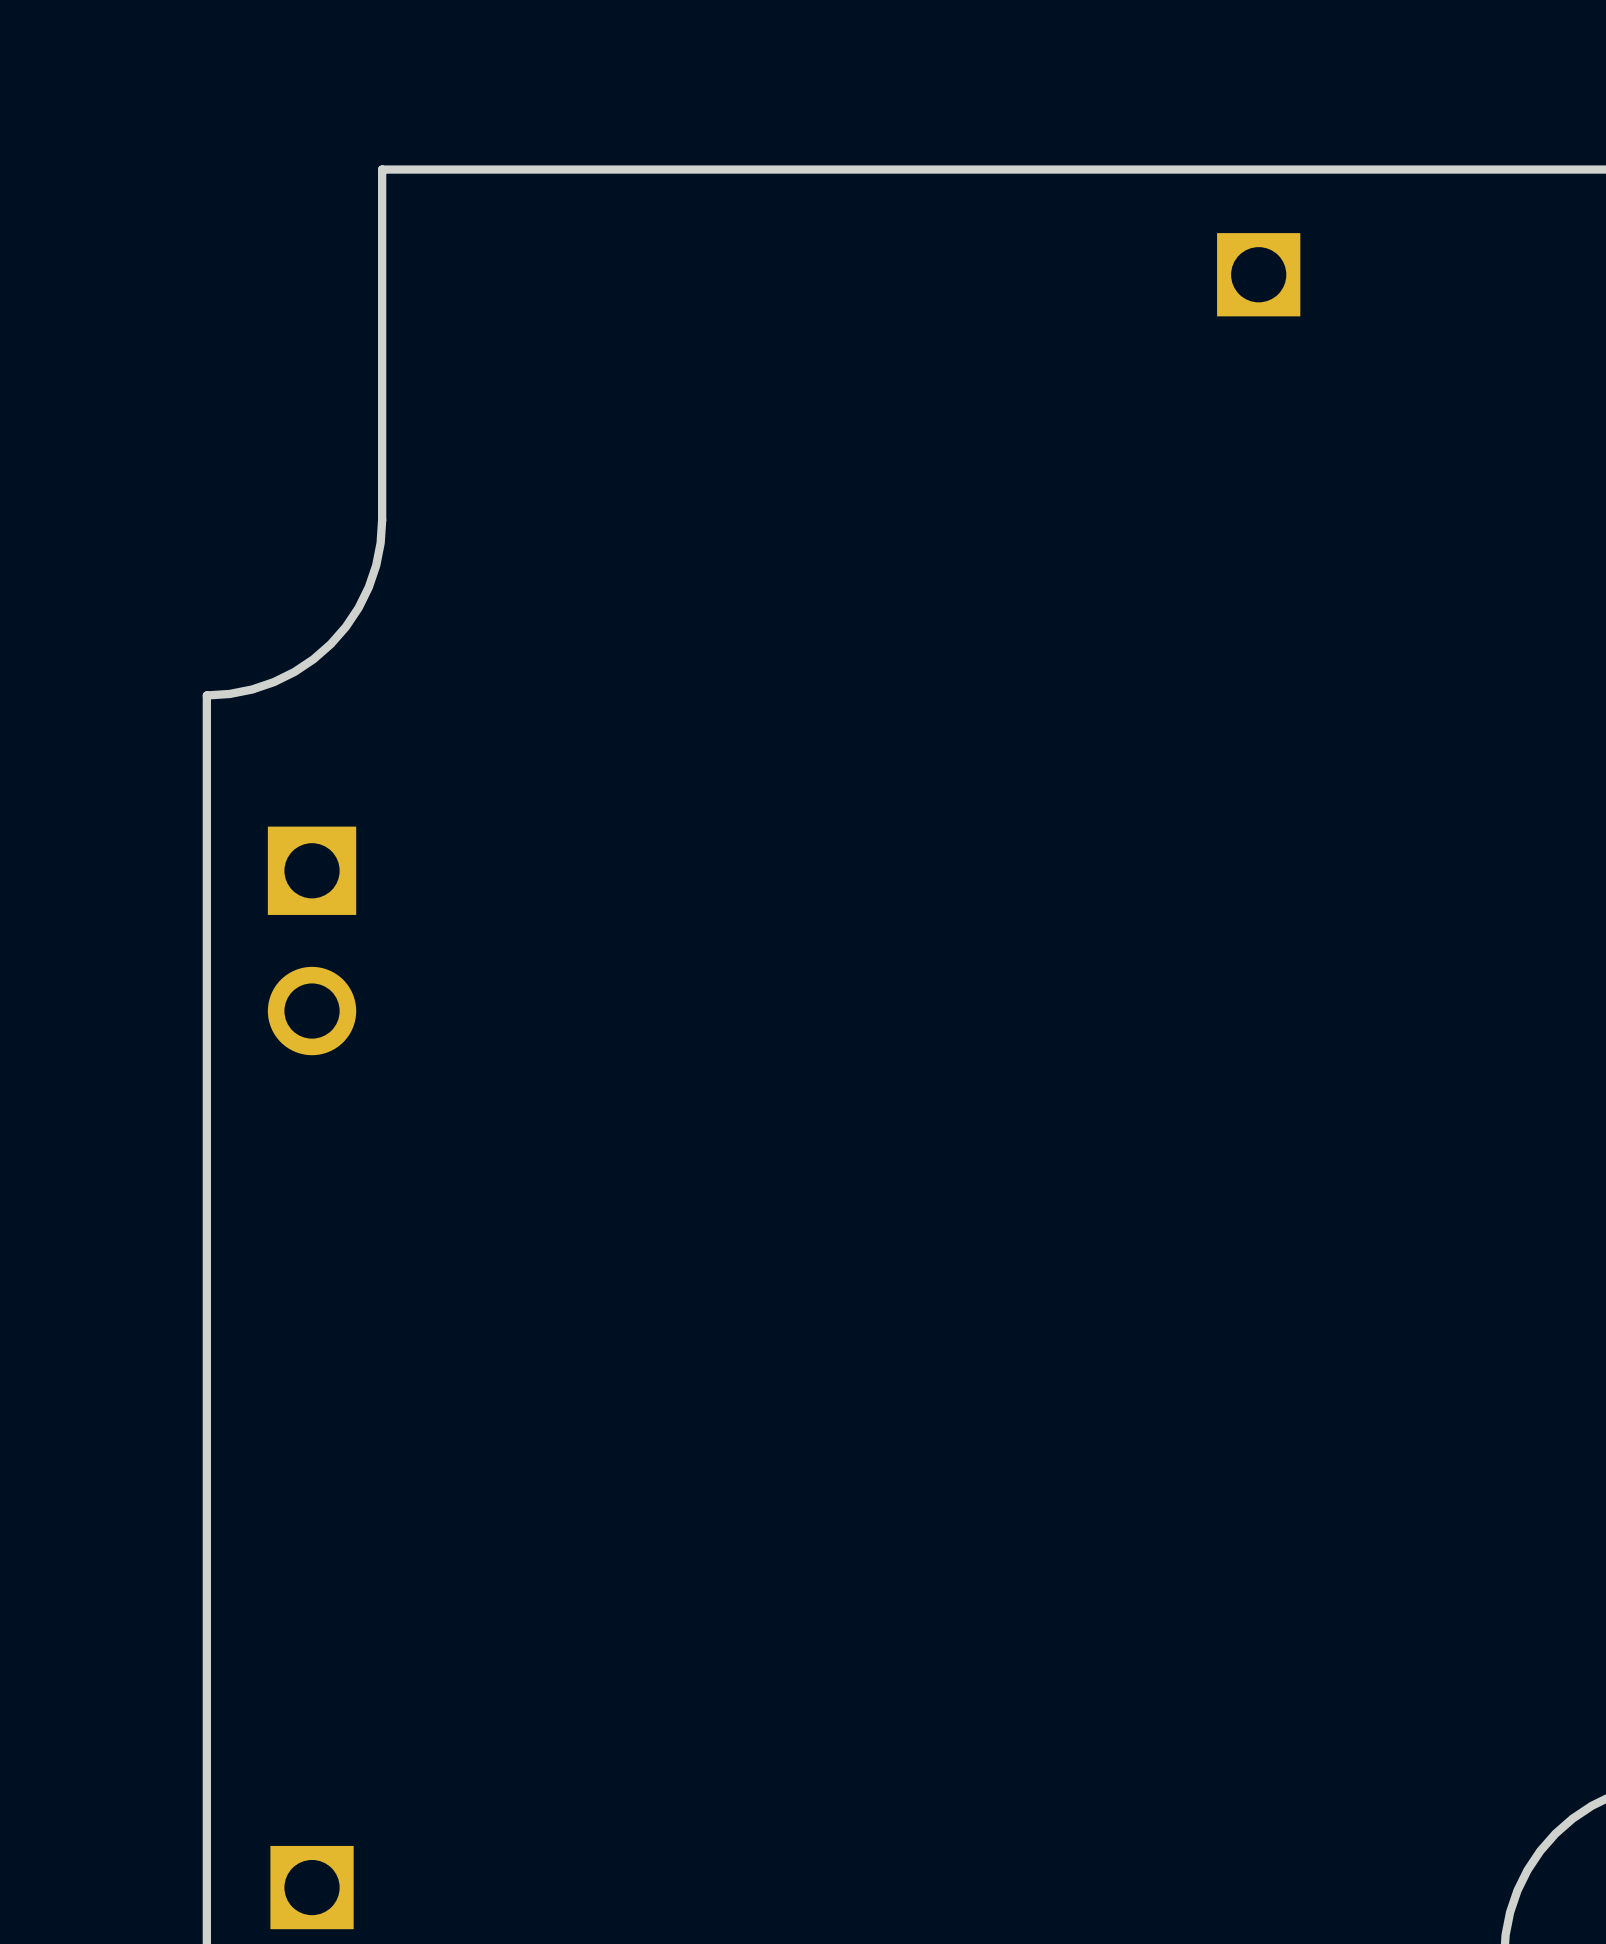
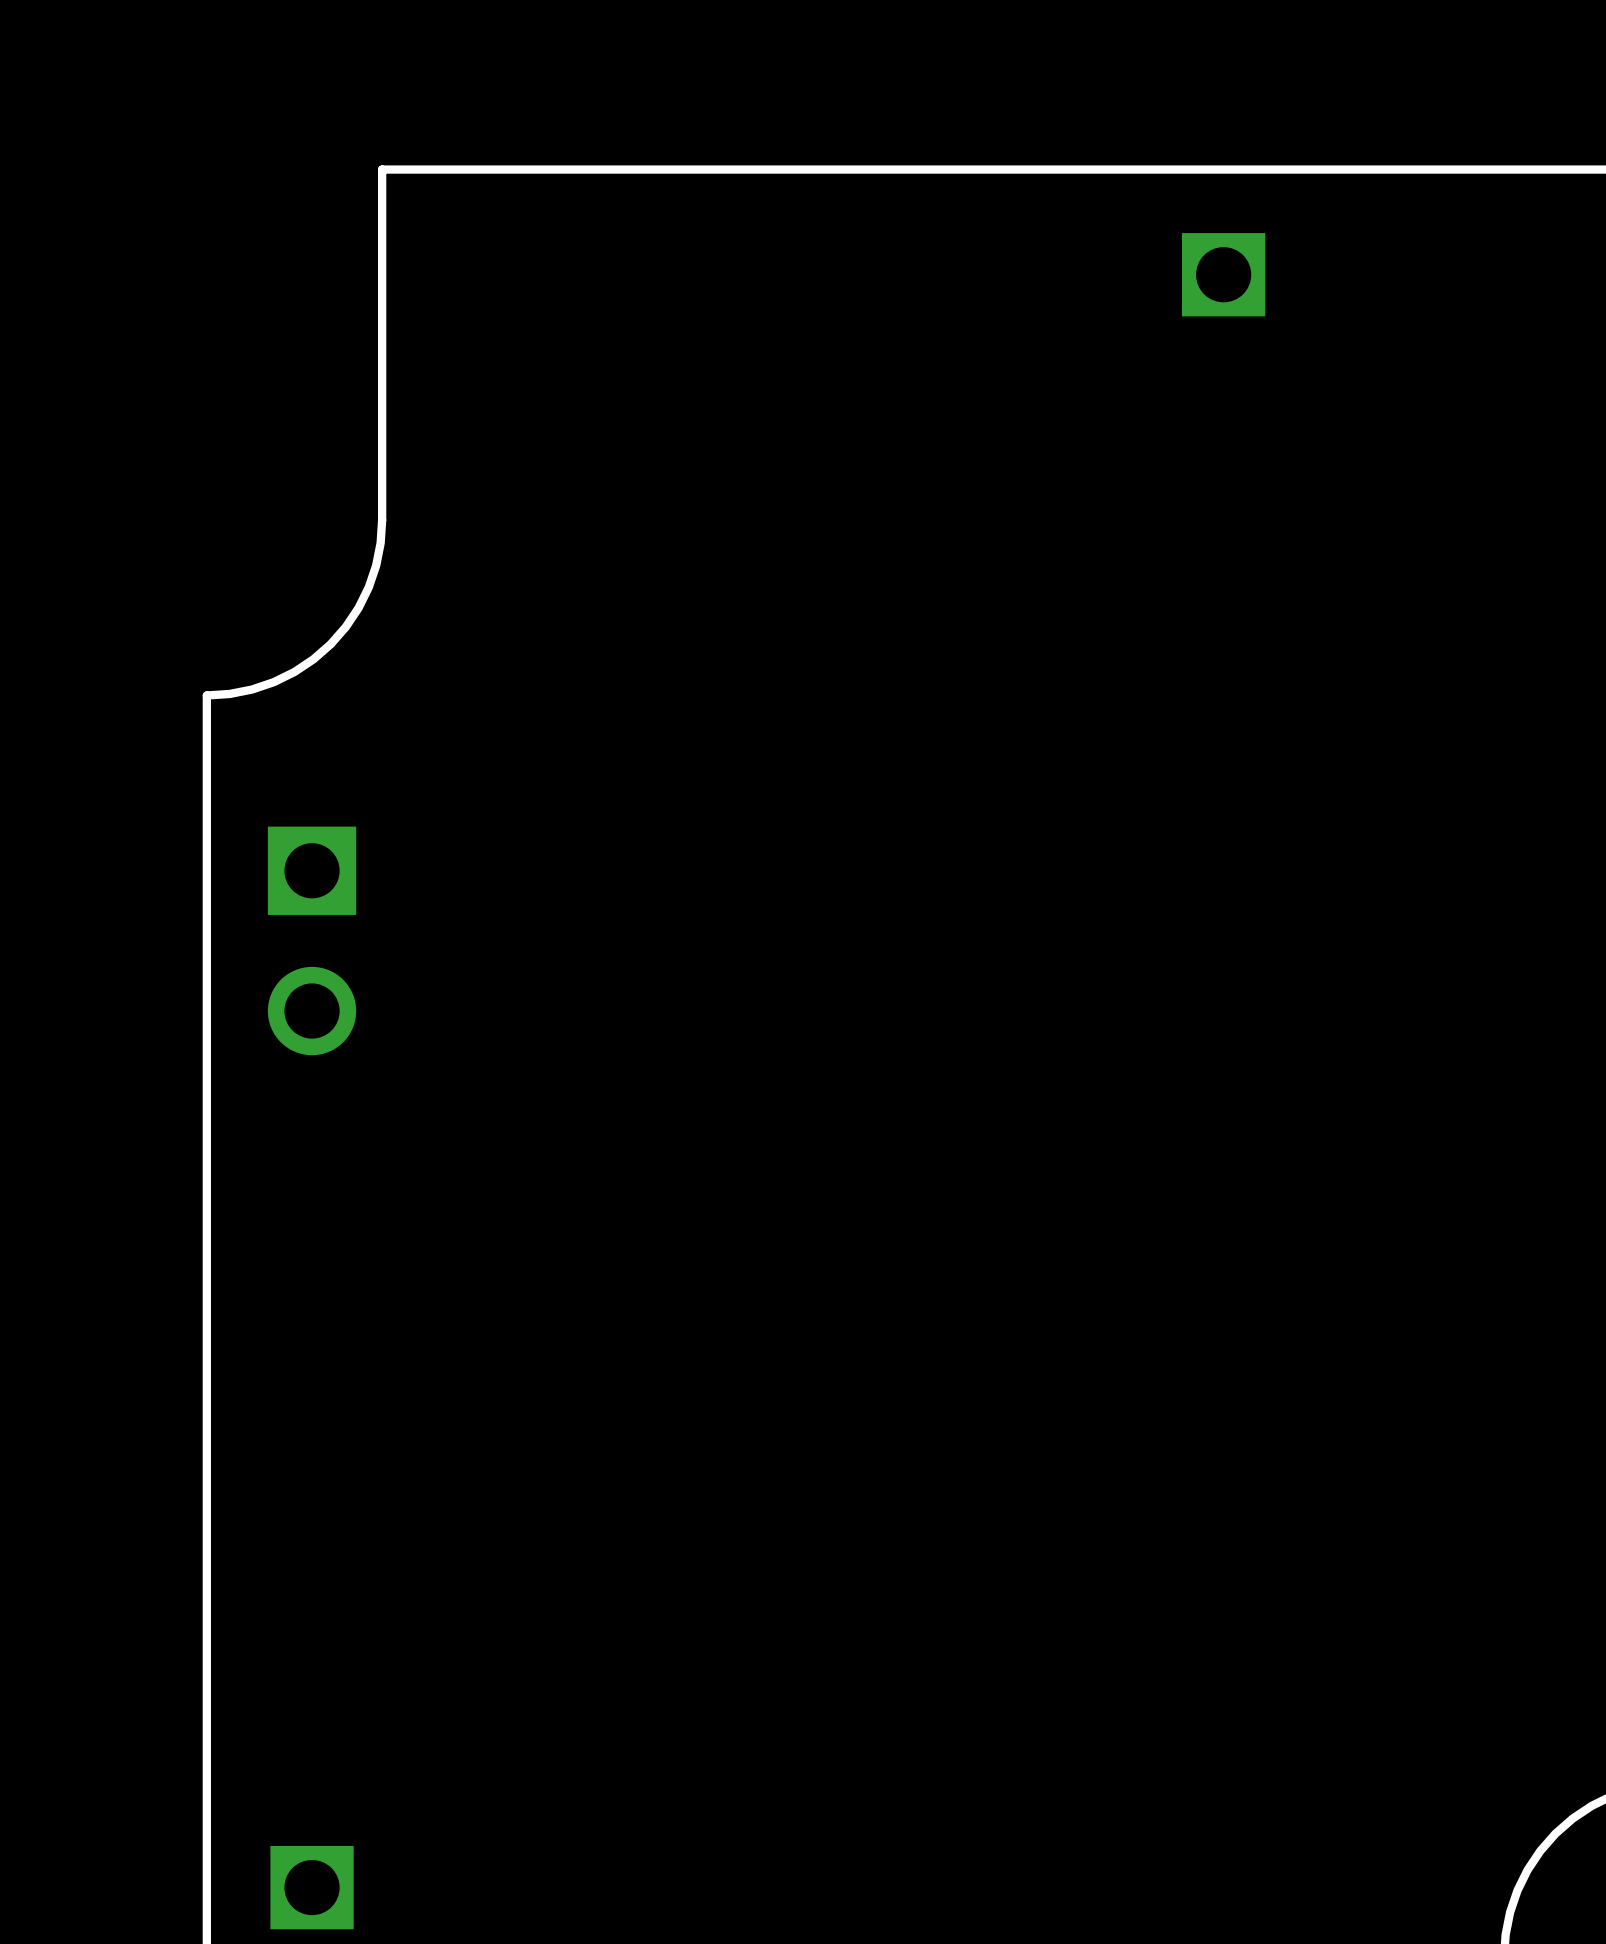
part position: (1258, 274) -> (1223, 274)

